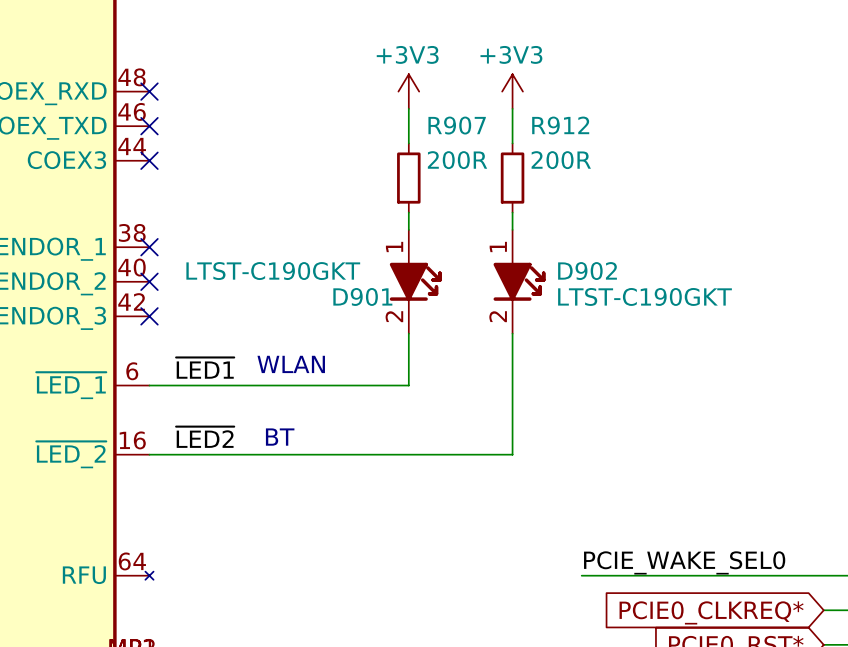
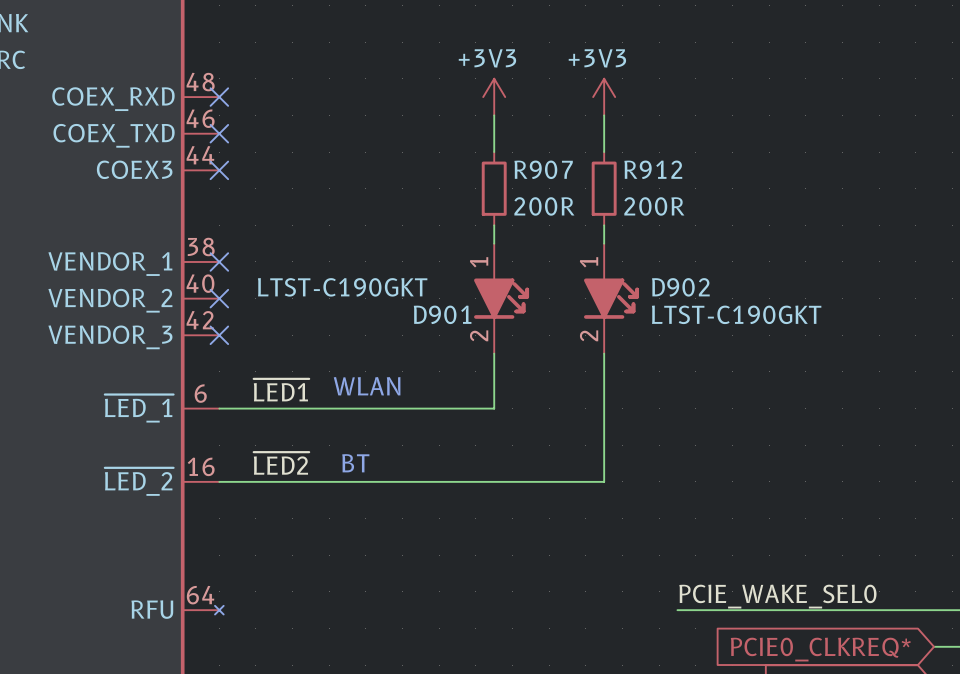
R907 name position: R907 (457, 125) -> R907 (543, 169)
R912 name position: R912 (560, 125) -> R912 (653, 169)
R907 text position: 200R (457, 160) -> 200R (544, 206)
R912 text position: 200R (561, 160) -> 200R (654, 206)

